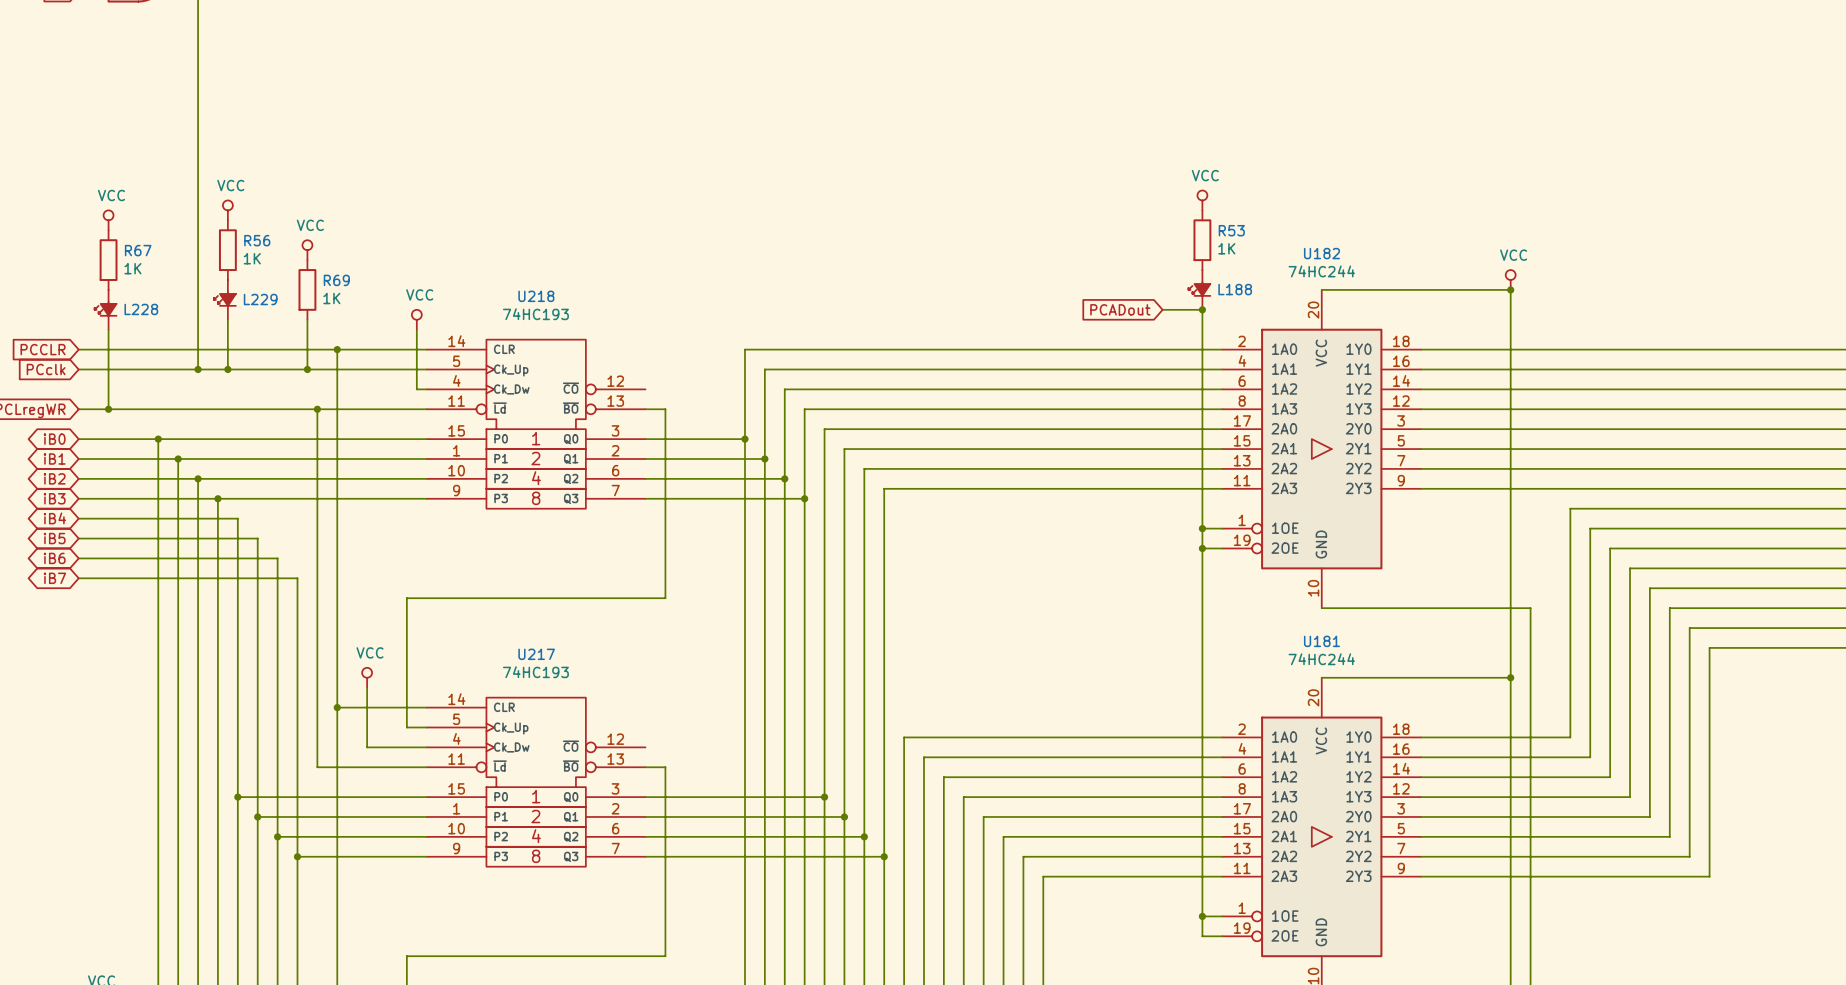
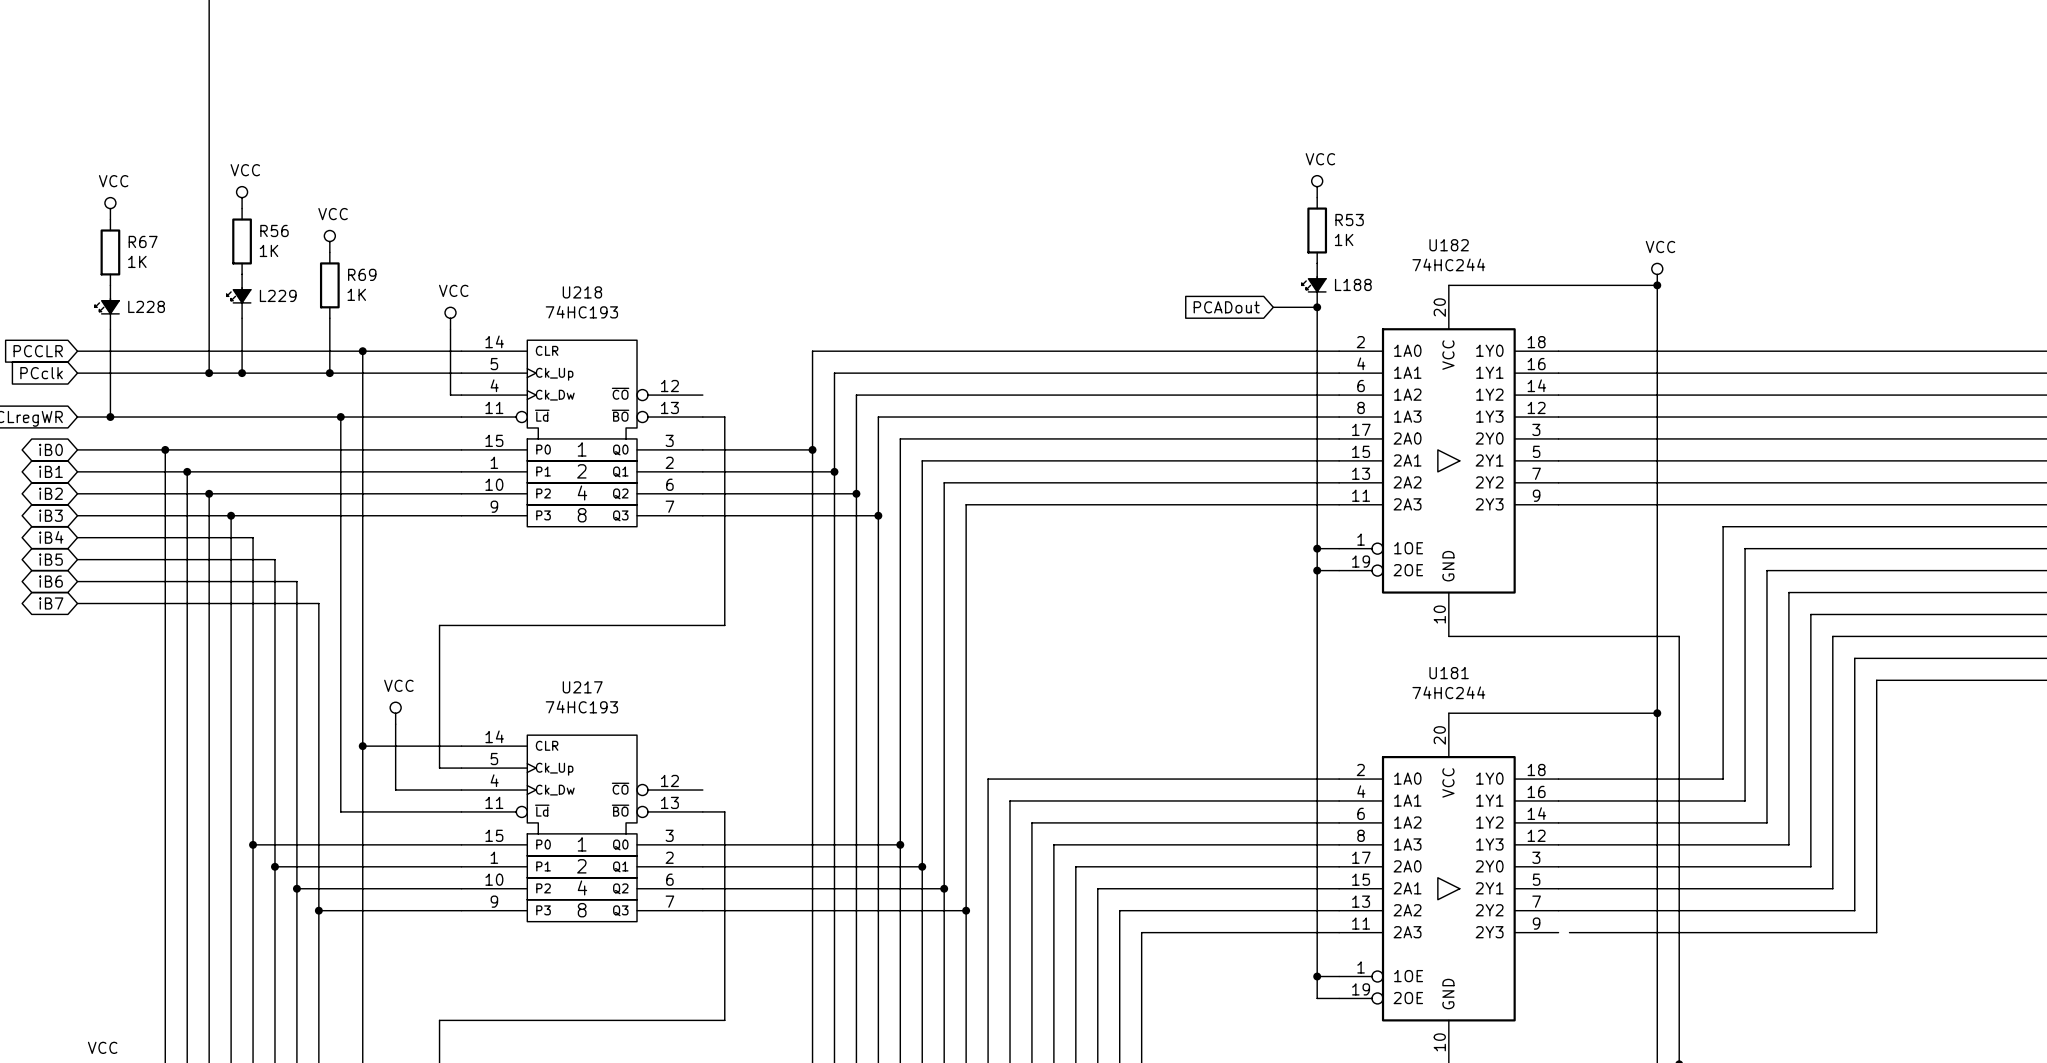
wire: (1421, 876) (1431, 876) -> none

